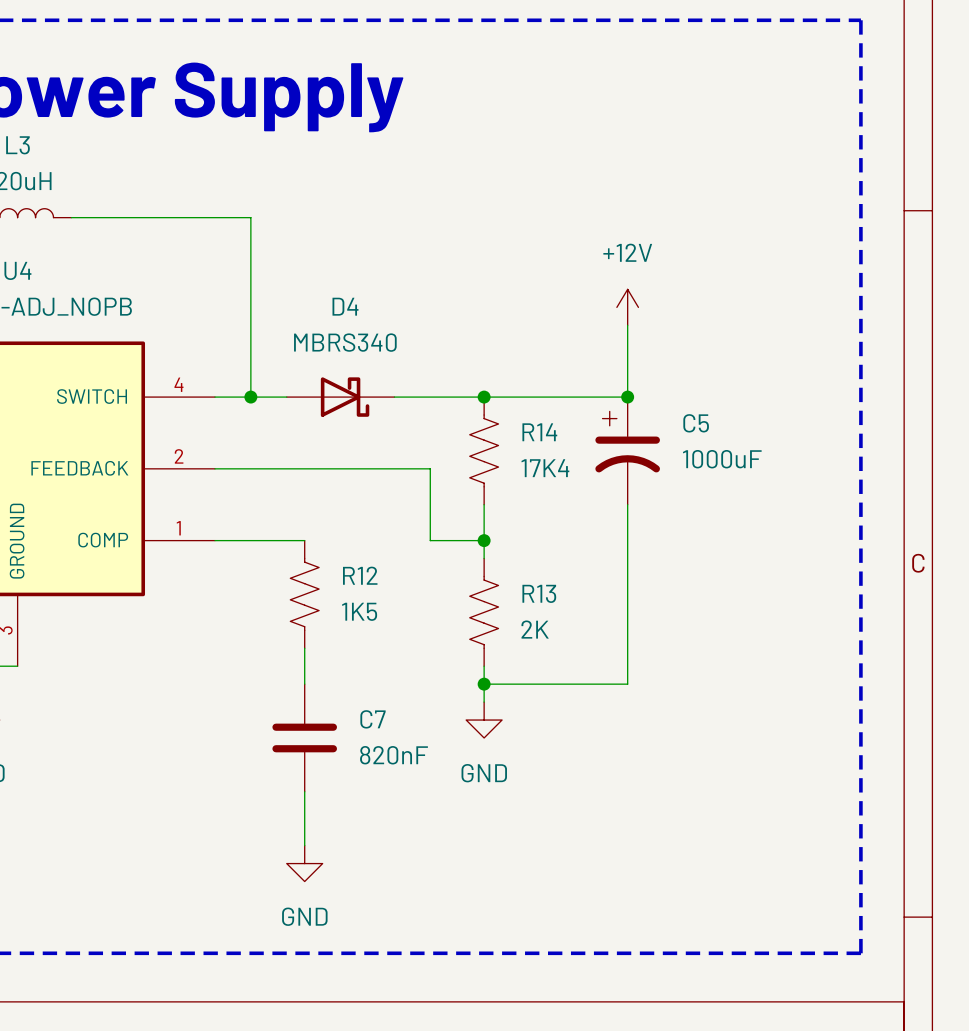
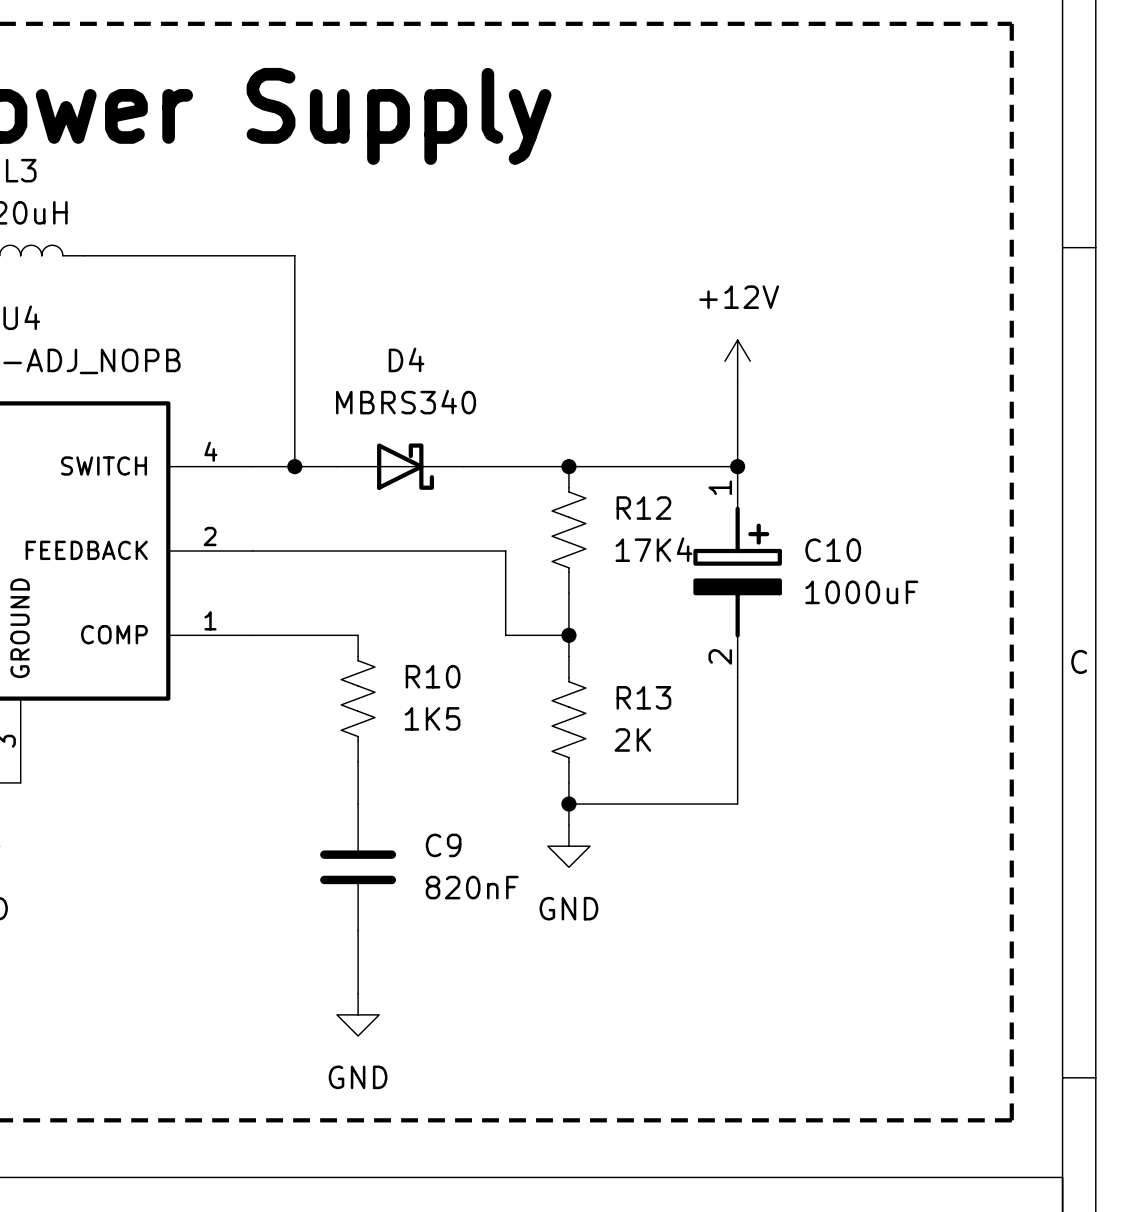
R14 name: R14 (539, 432) -> R12 (643, 508)
C5: 1000uF (627, 450) -> none
C10: none -> 1000uF (737, 572)
R12 name: R12 (360, 575) -> R10 (433, 676)
C7 name: C7 (373, 719) -> C9 (443, 845)

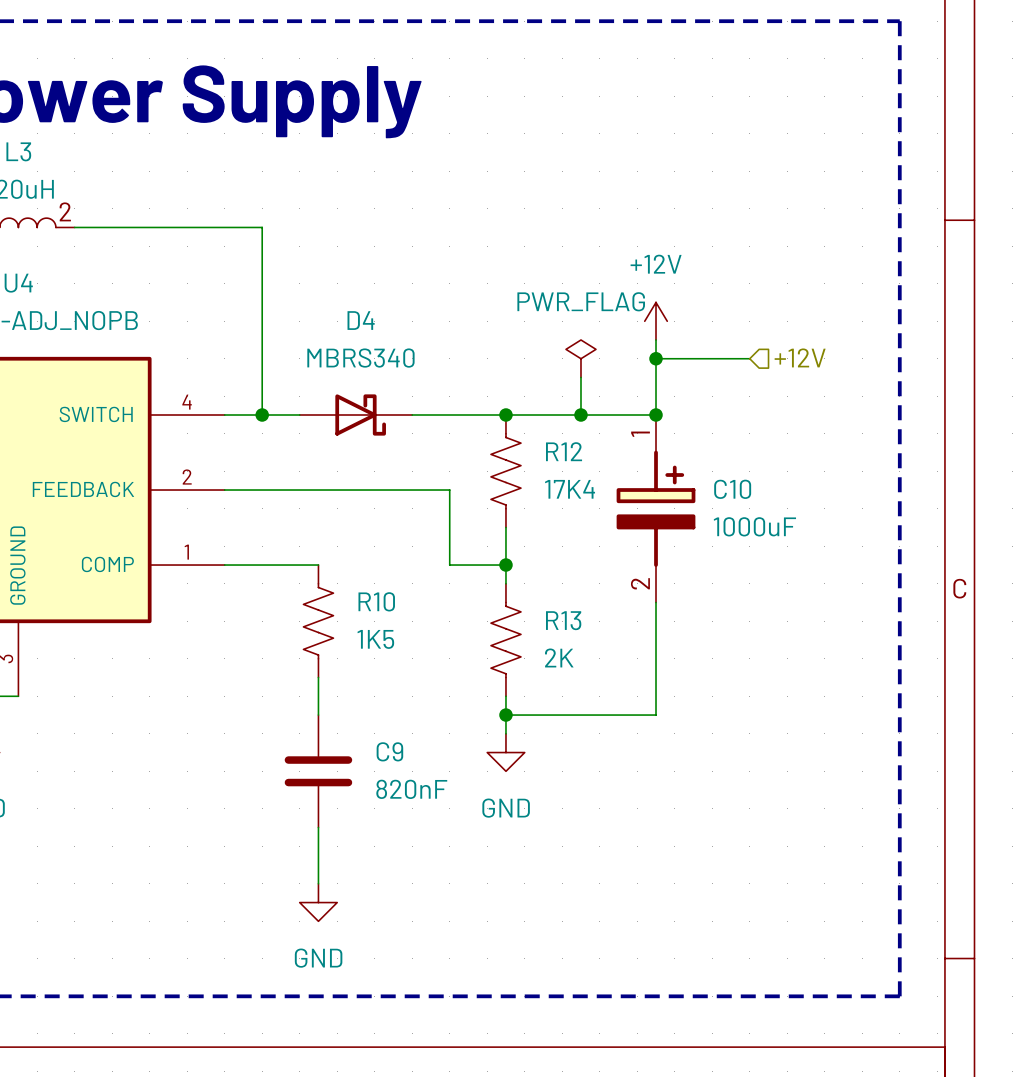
L3 pin number: none -> 2 (65, 211)
hierarchical label: none -> +12V (800, 357)
power symbol: none -> PWR_FLAG (580, 358)
wire: none -> (656, 358) (749, 358)
junction: none -> (656, 358)
wire: none -> (580, 377) (580, 415)
junction: none -> (580, 415)

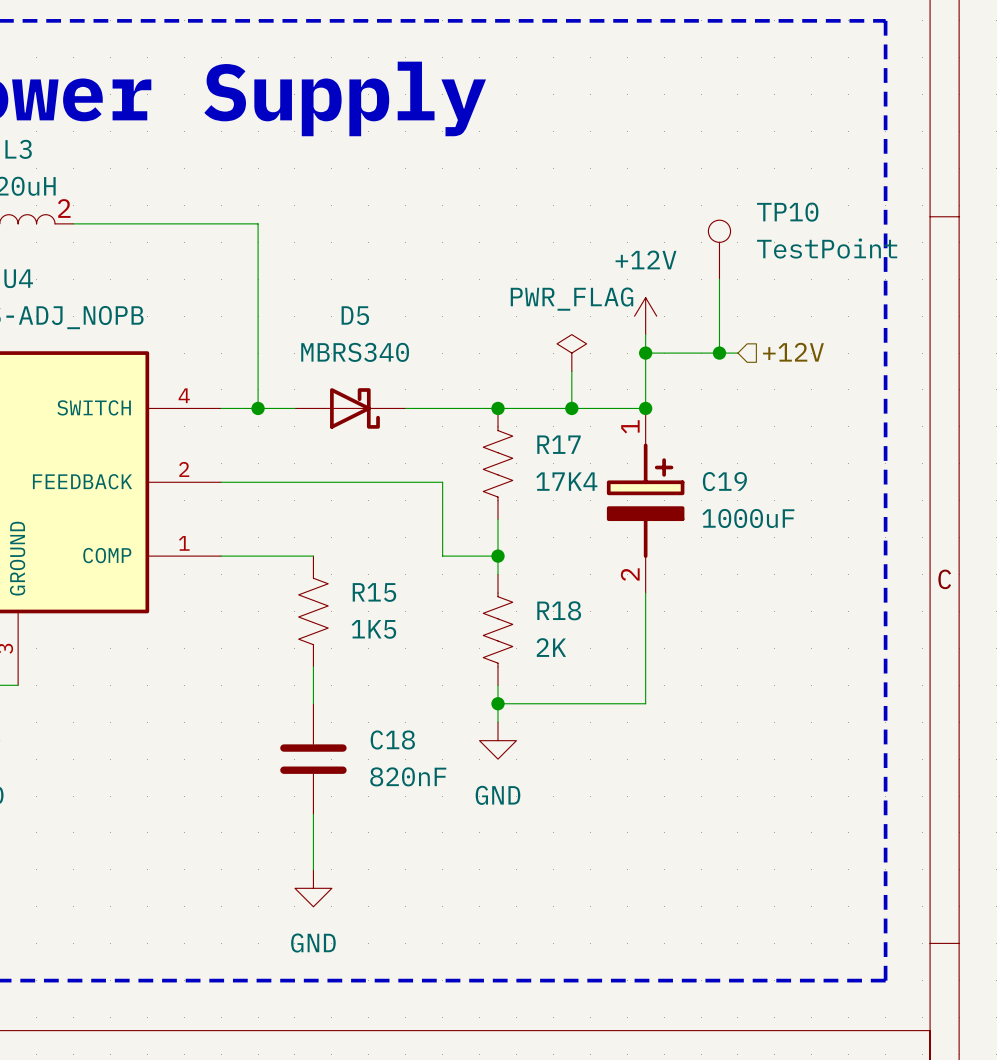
TP10: none -> TestPoint (719, 249)
wire: none -> (719, 279) (719, 353)
D4 name: D4 (361, 320) -> D5 (355, 315)
junction: none -> (719, 353)
R12 name: R12 (564, 451) -> R17 (558, 444)
C10 name: C10 (732, 489) -> C19 (724, 481)
R10 name: R10 (376, 601) -> R15 (374, 592)
R13 name: R13 (563, 620) -> R18 (559, 610)
C9 name: C9 (389, 751) -> C18 (392, 739)

